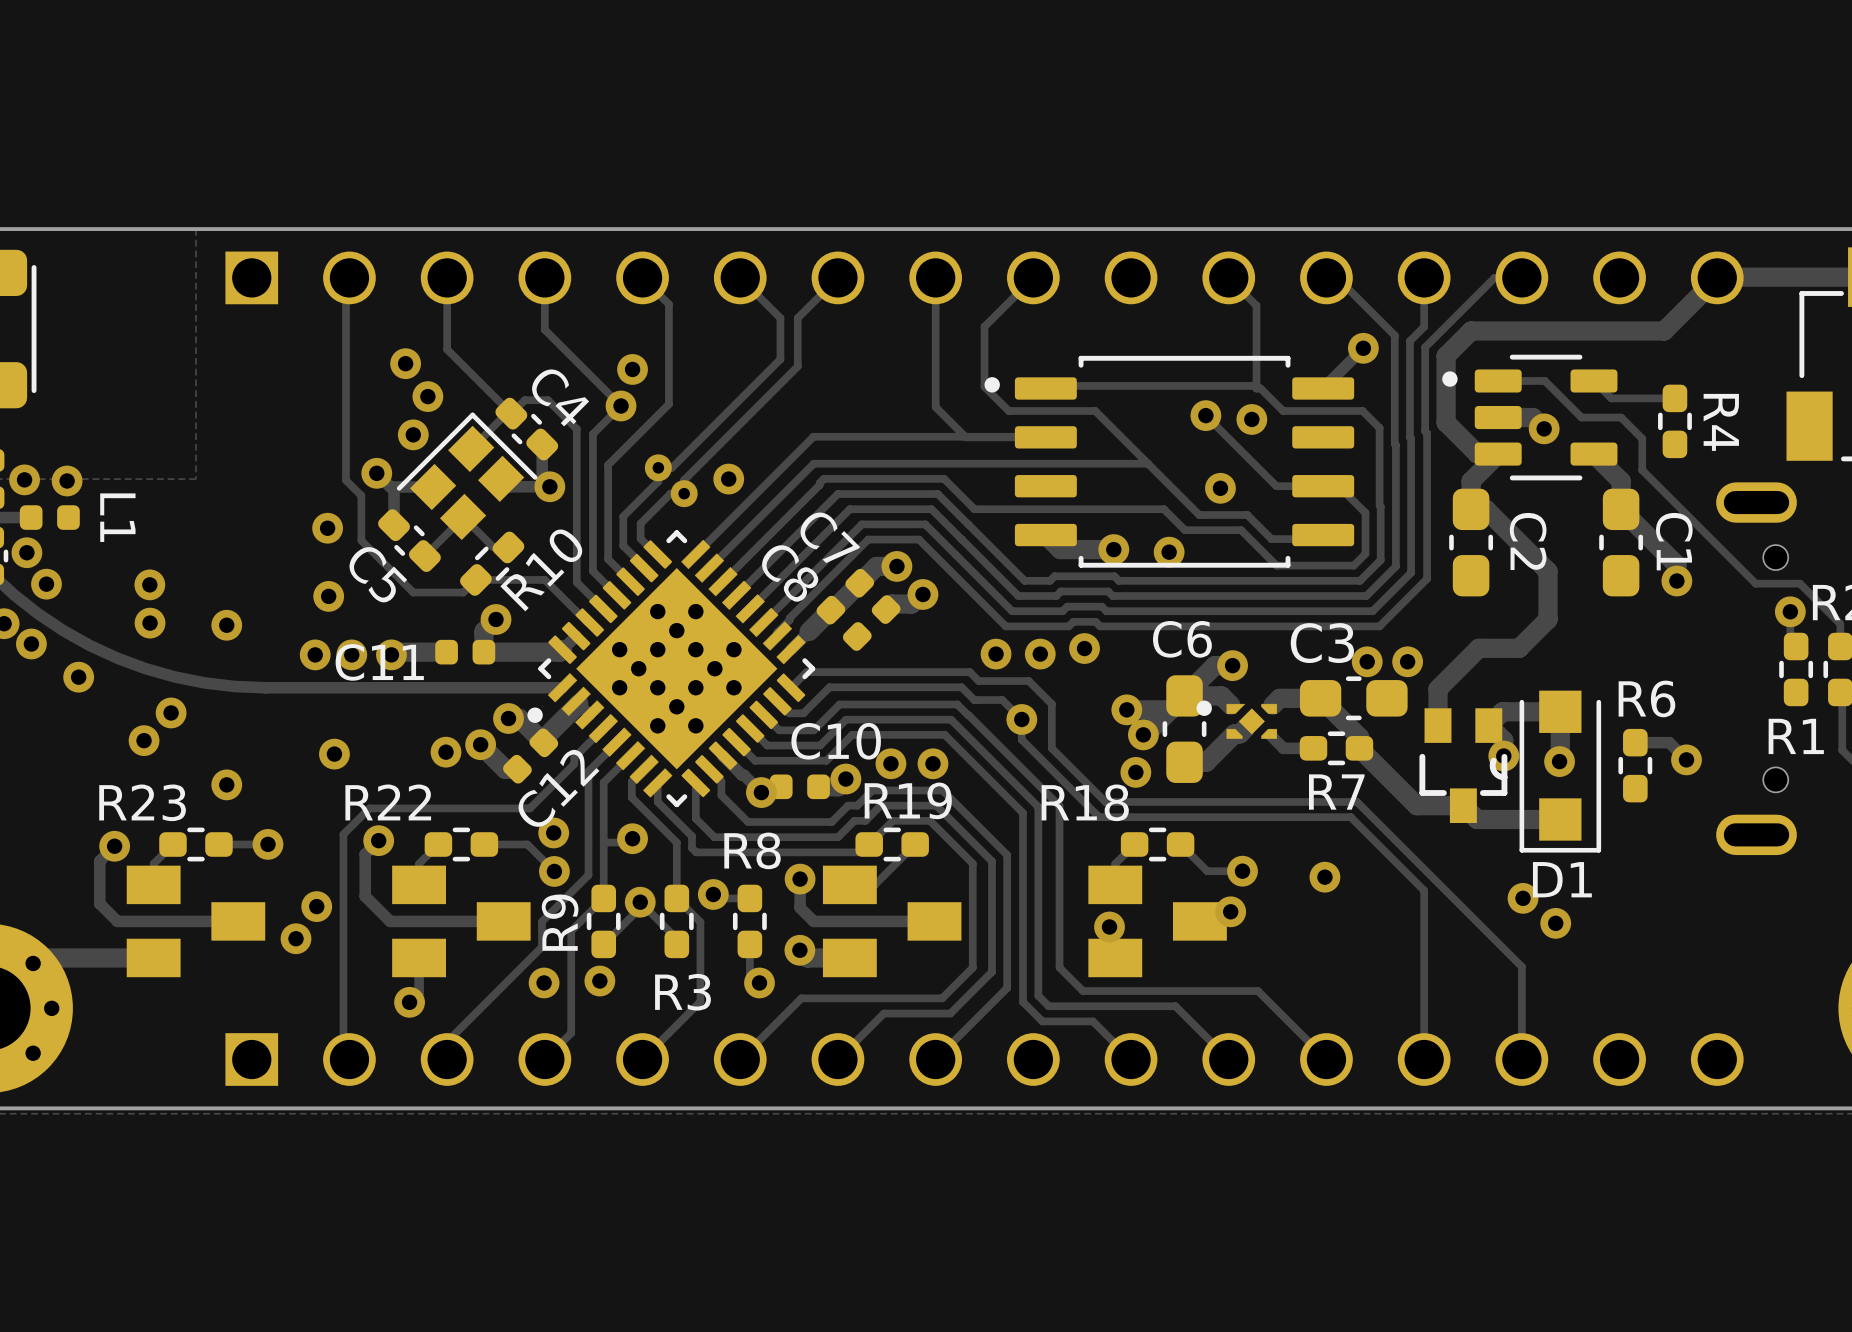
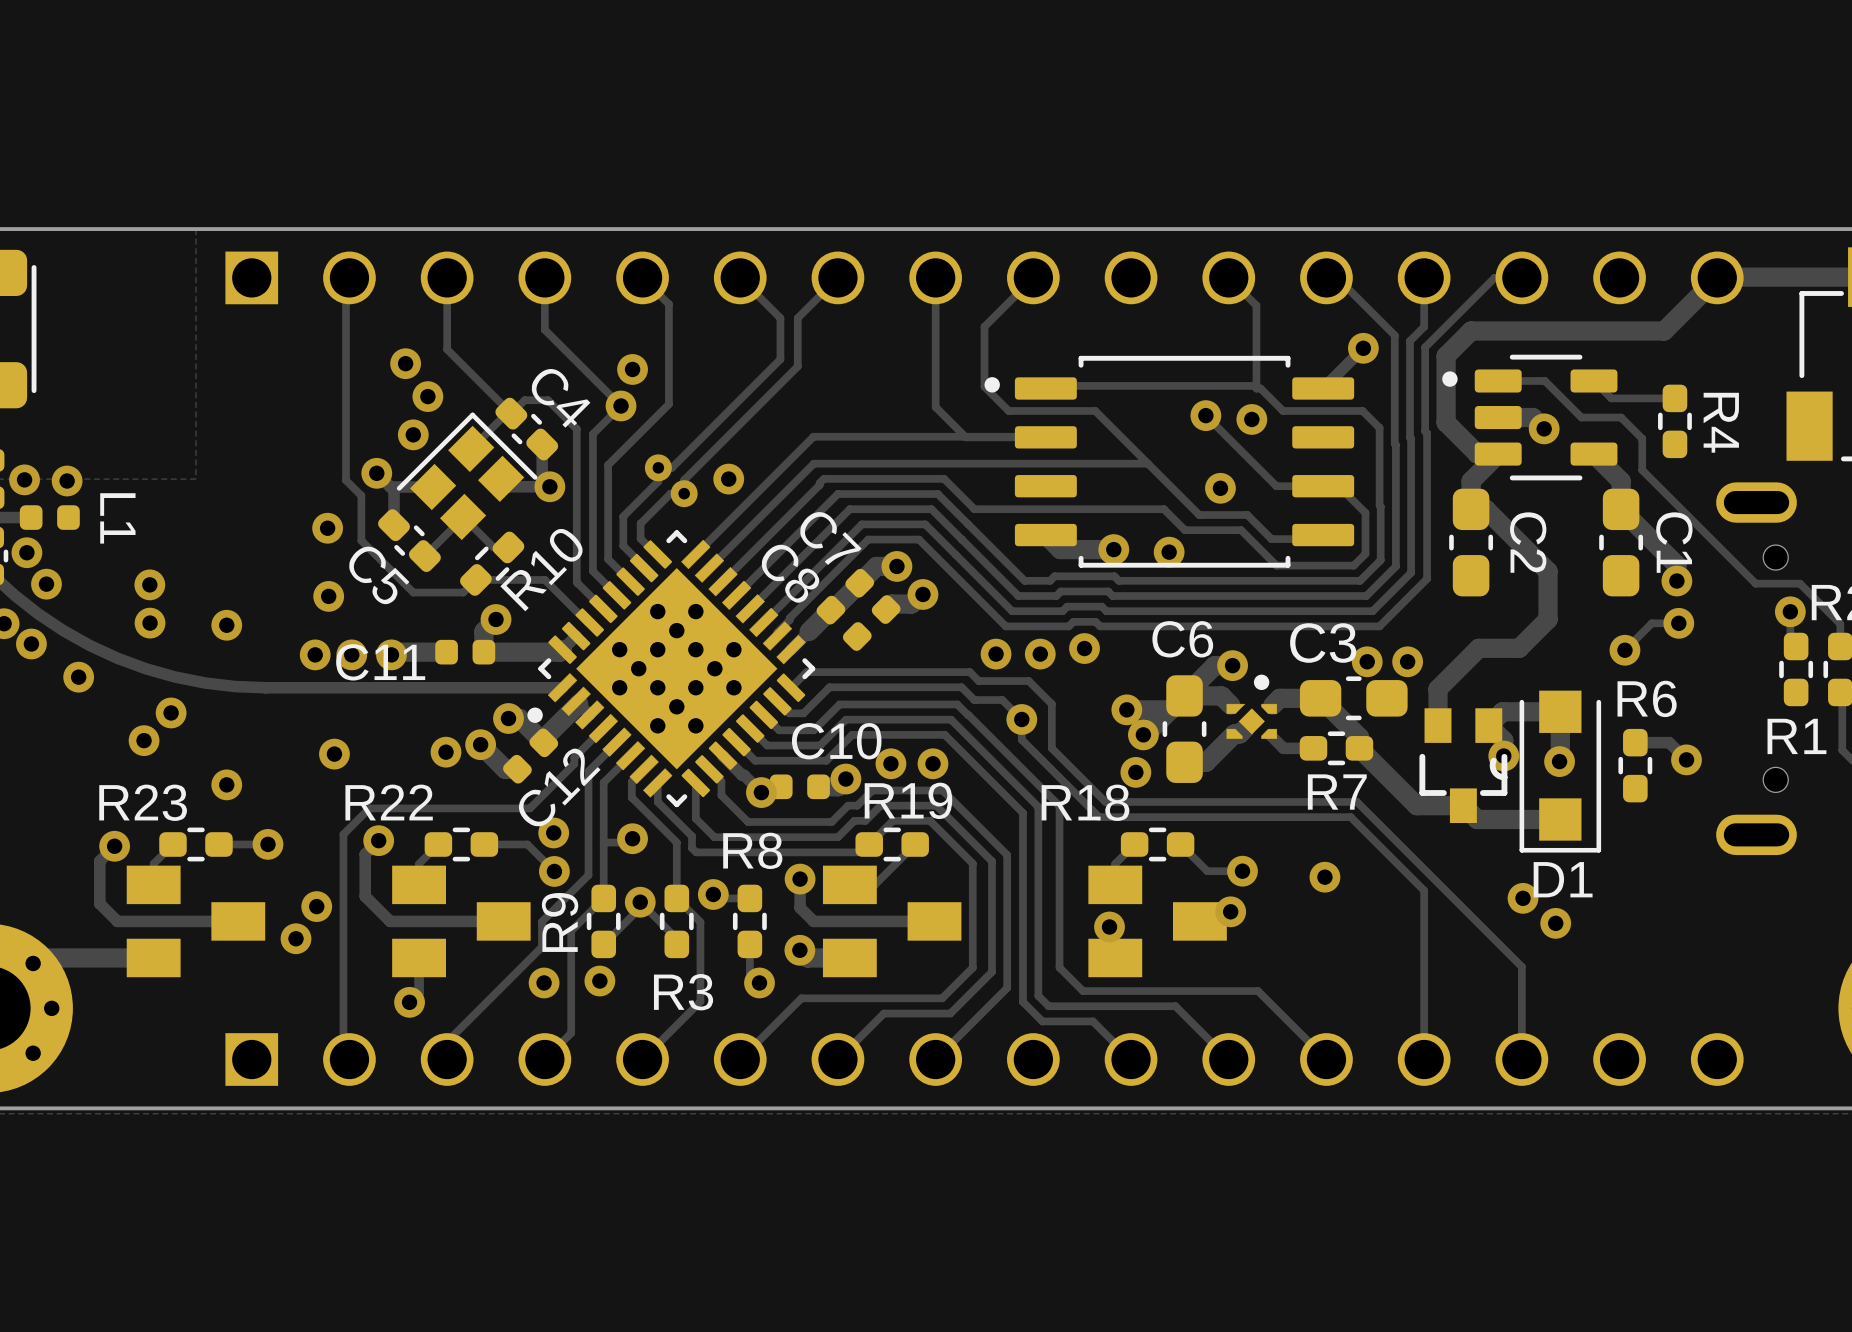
track: none -> (1678, 623) (1651, 623) (1624, 650)
via: none -> (1678, 623)
via: none -> (1624, 650)
part footprint: [1196, 700, 1278, 739] -> [1226, 674, 1278, 739]

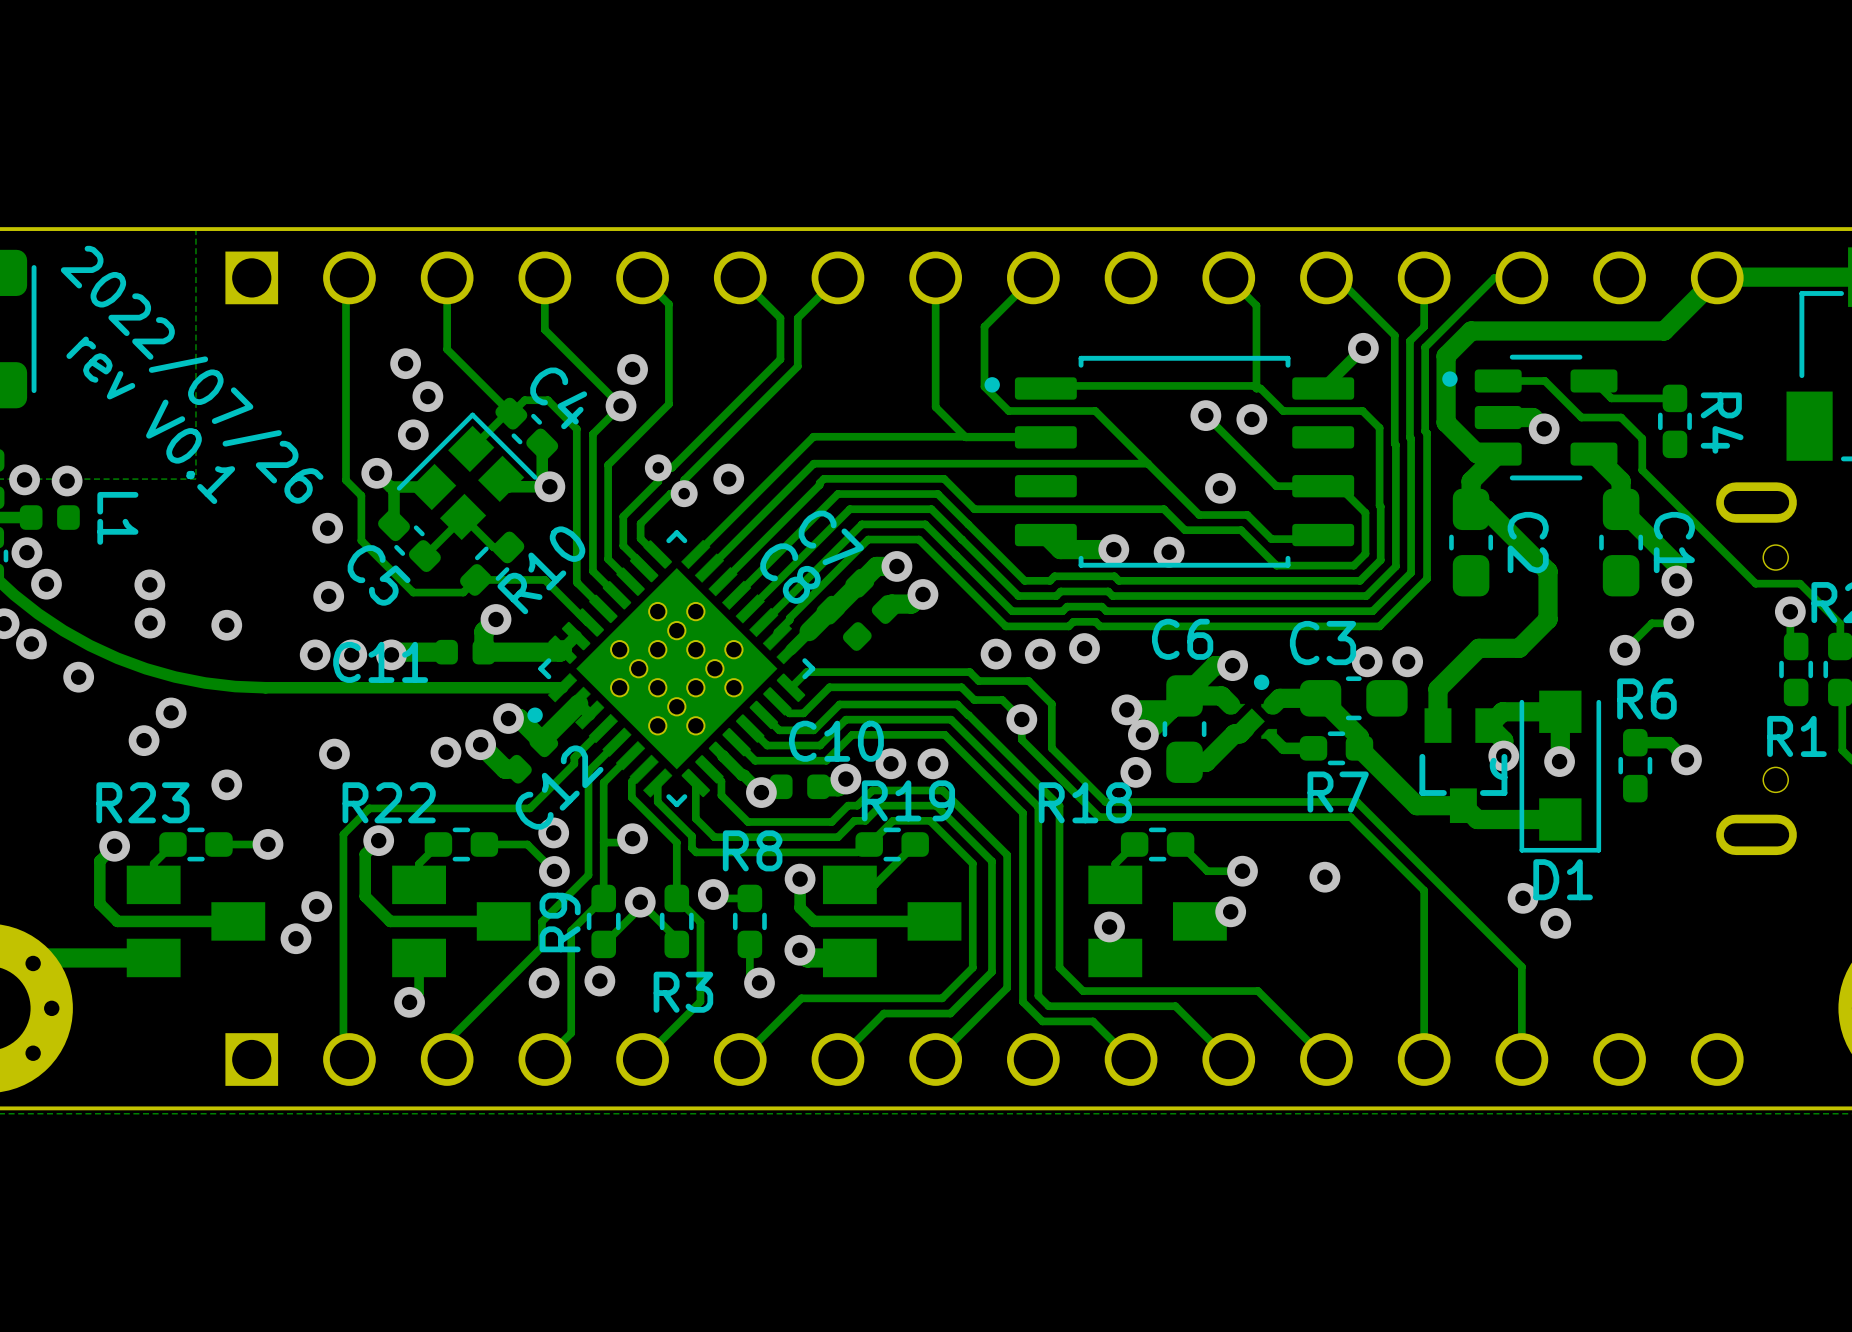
text: none -> 2022/07/26 (192, 374)
text: none -> rev V0.1 (150, 420)

